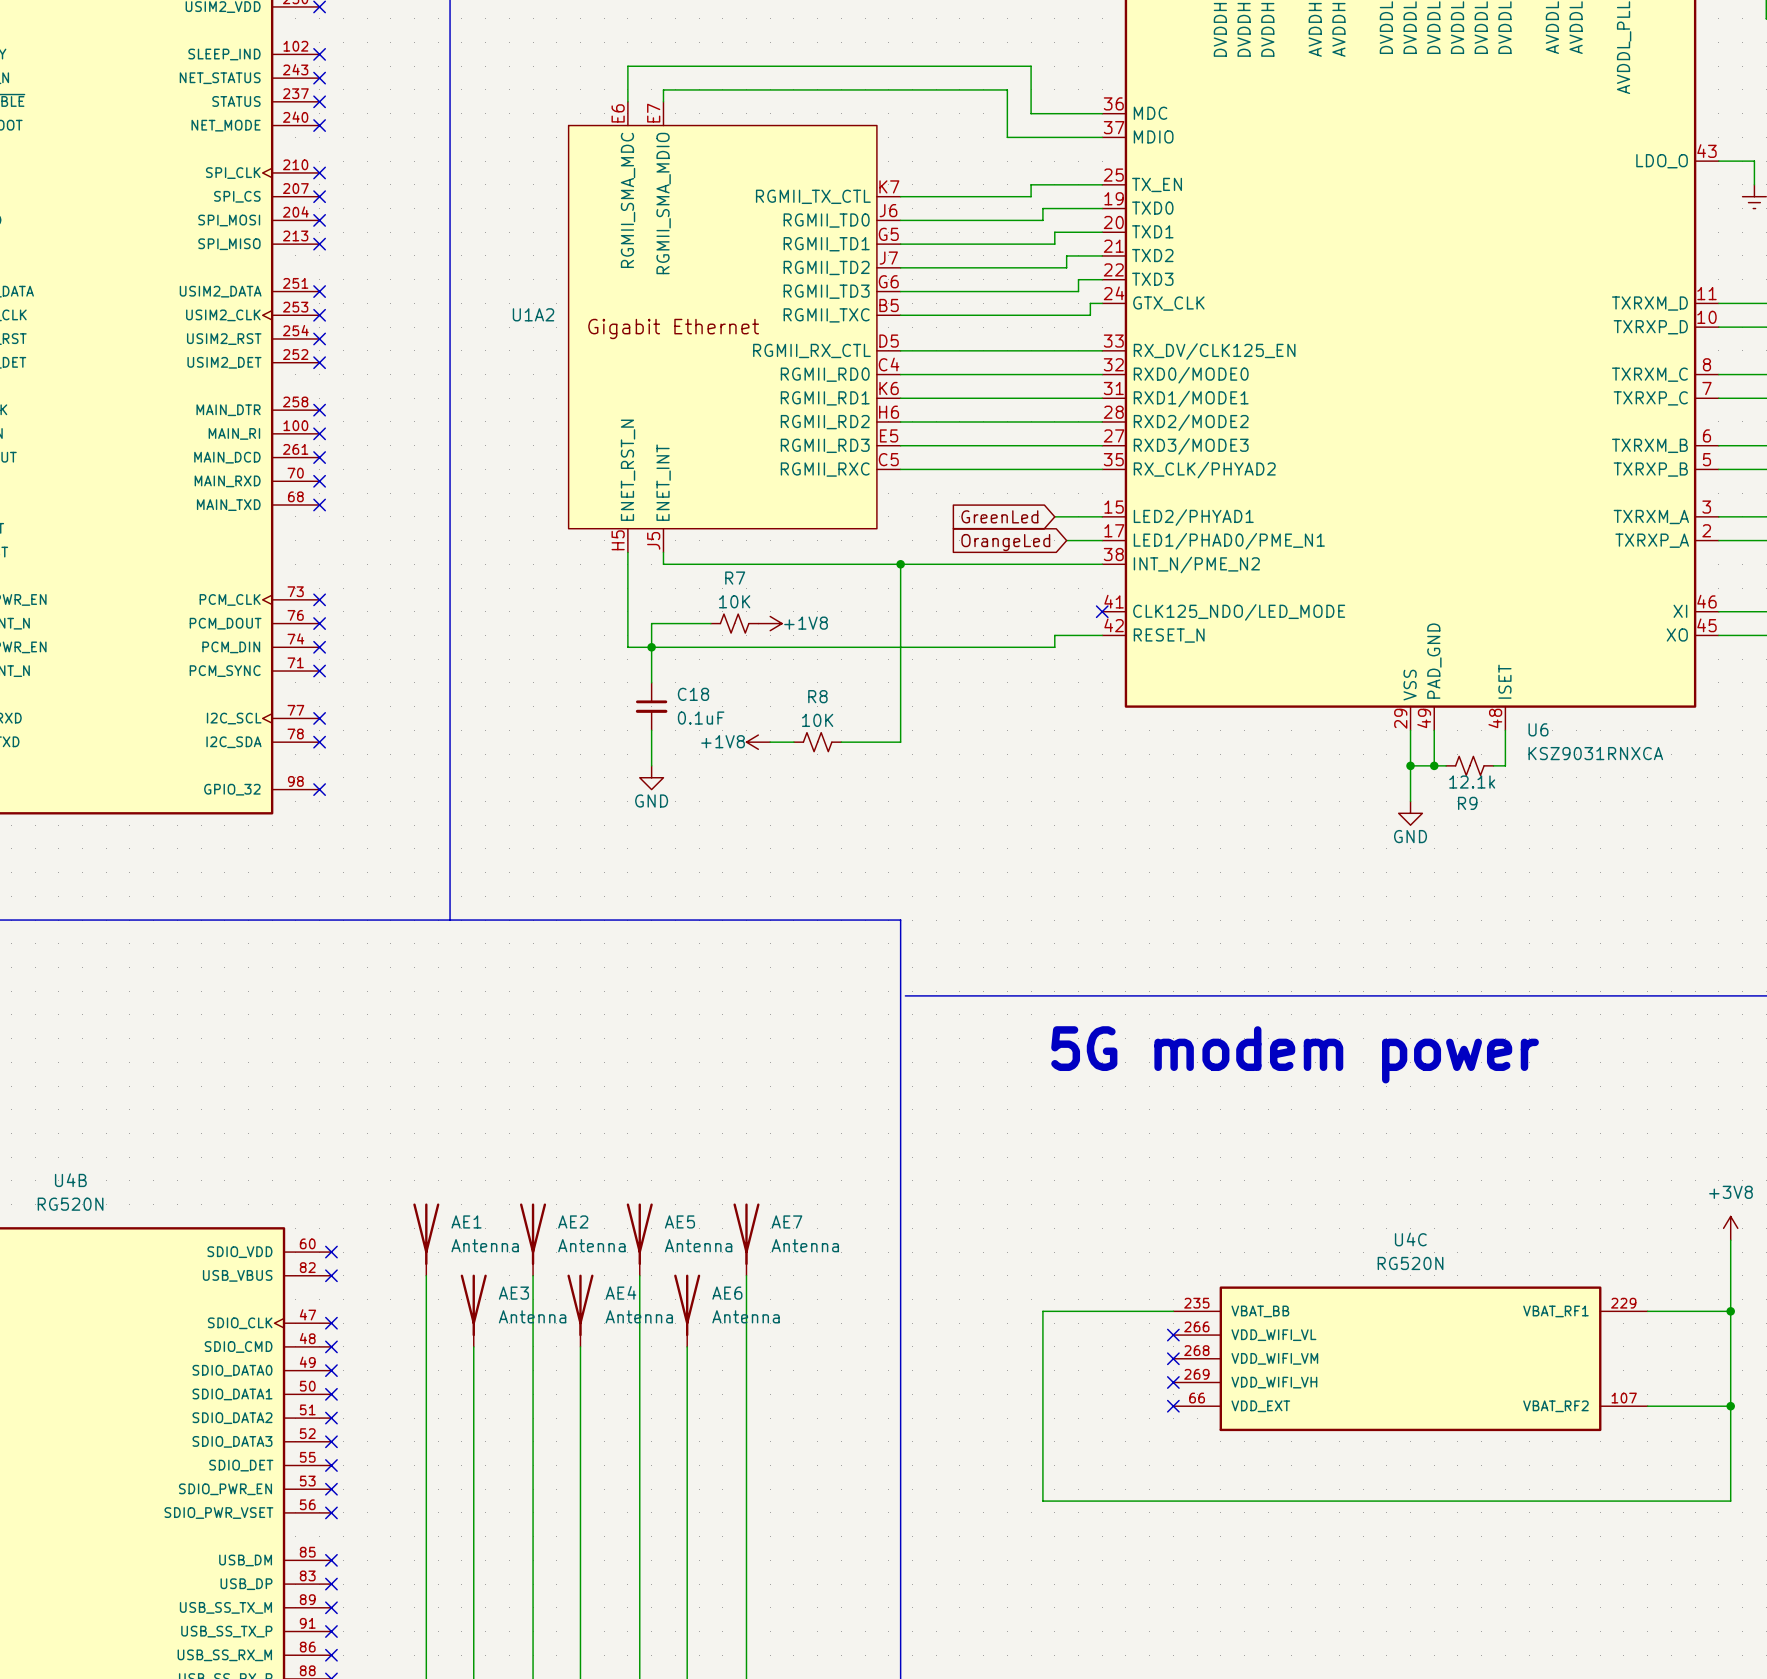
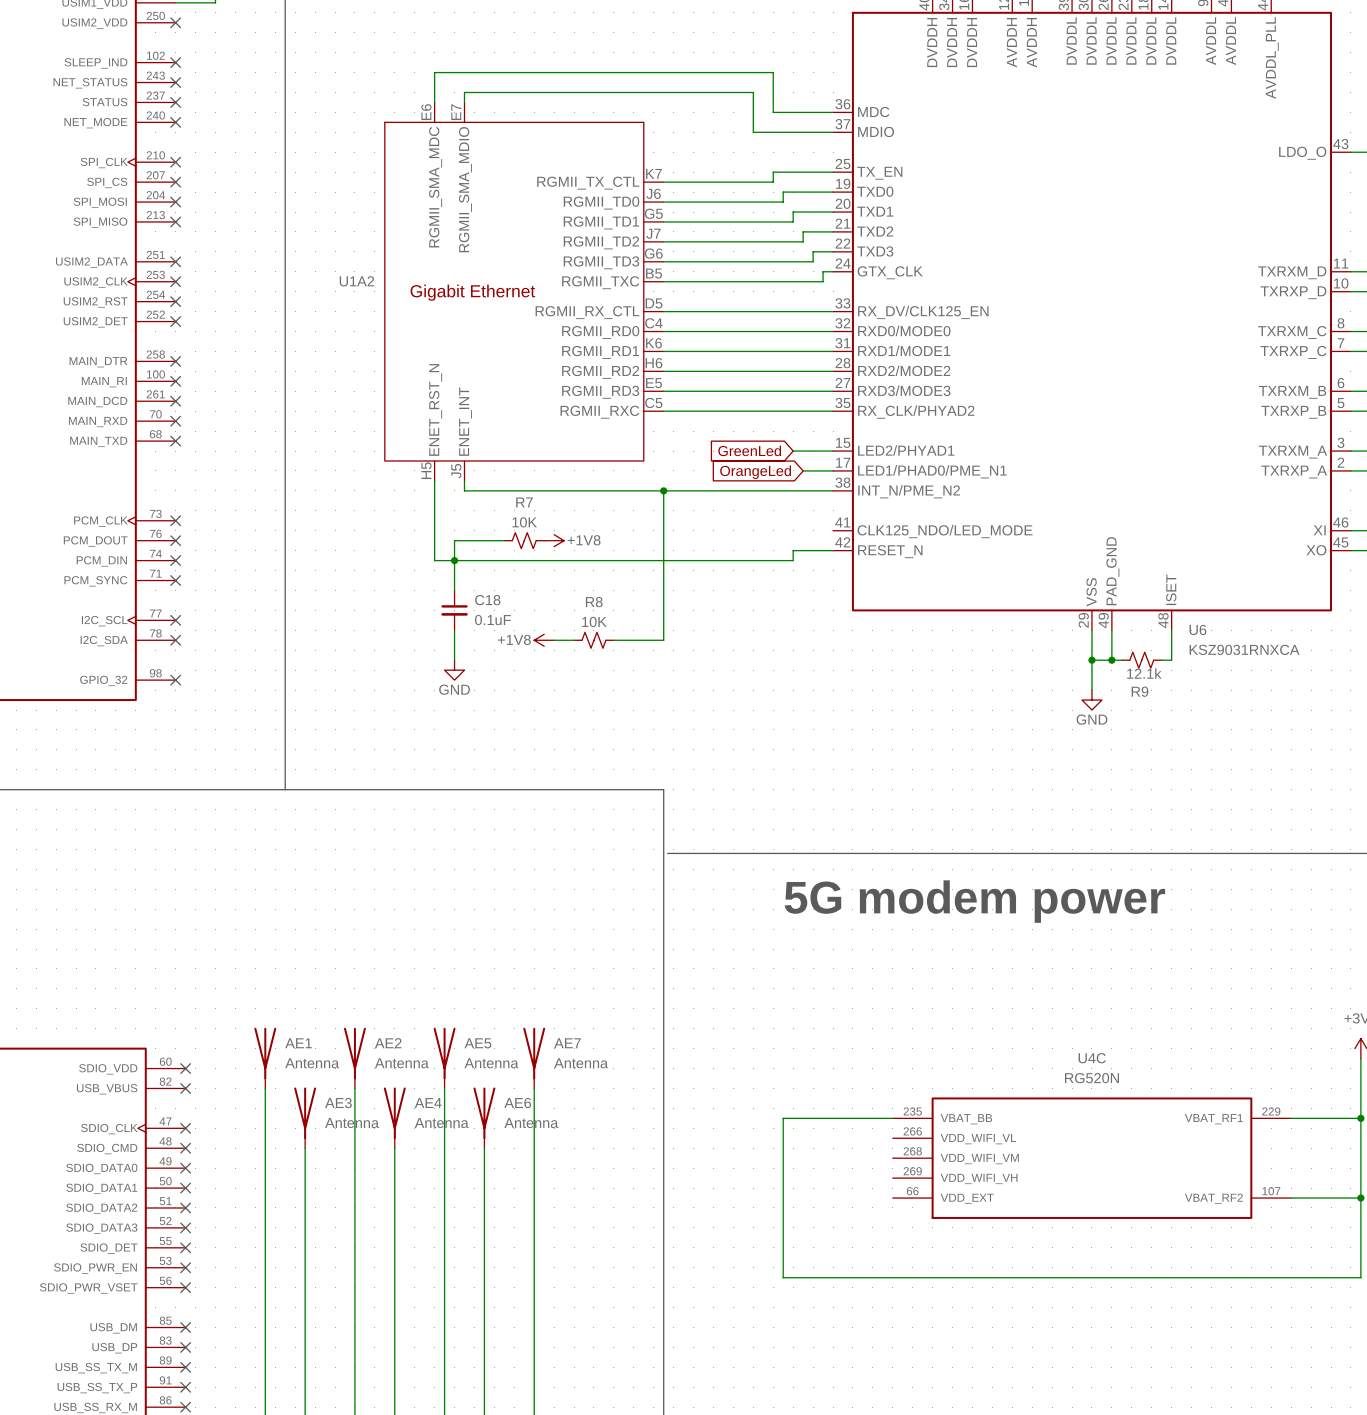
no-connect mark: (1102, 611) -> none
no-connect mark: (1173, 1335) -> none
no-connect mark: (1173, 1358) -> none
no-connect mark: (1173, 1382) -> none
no-connect mark: (1173, 1406) -> none

